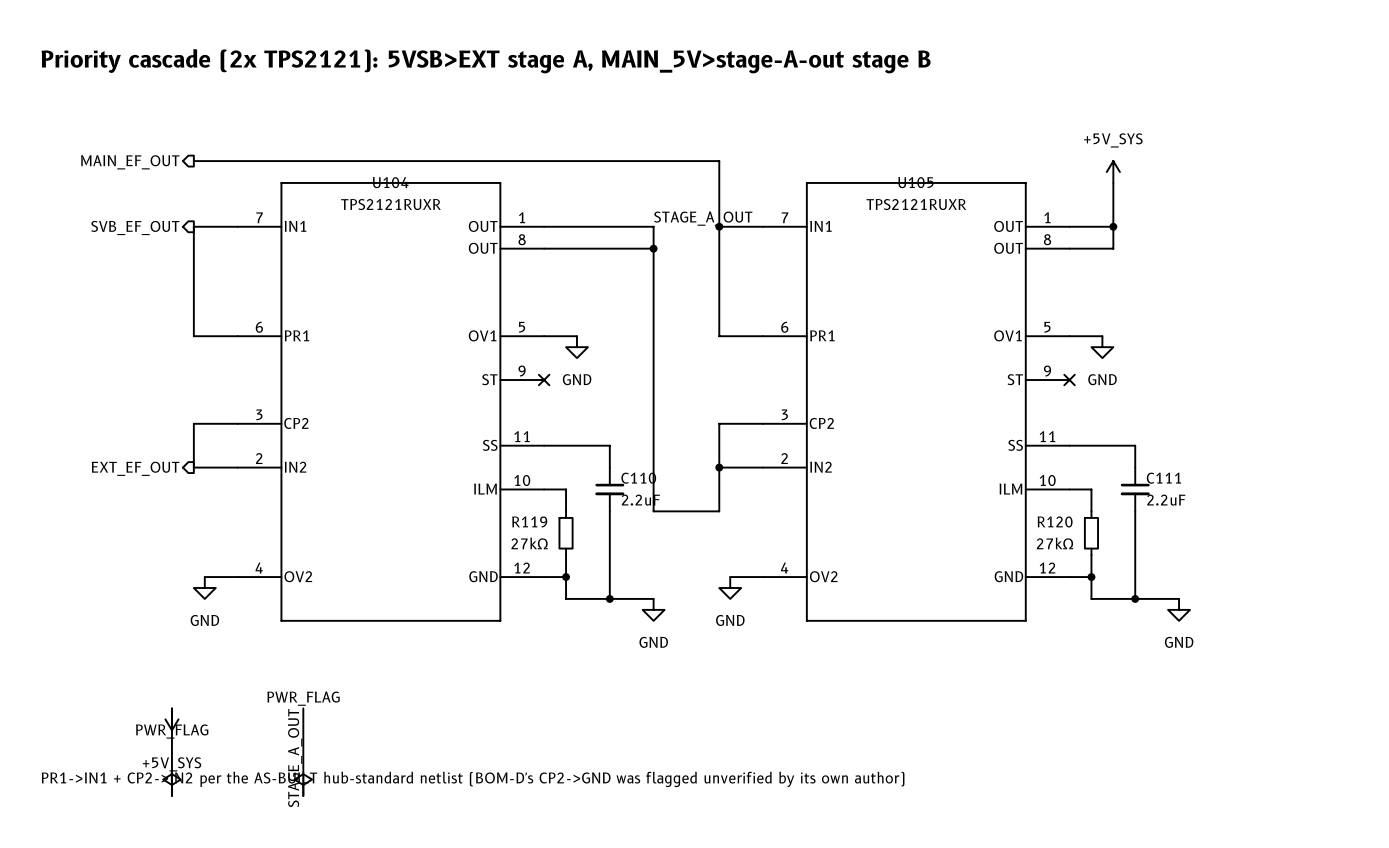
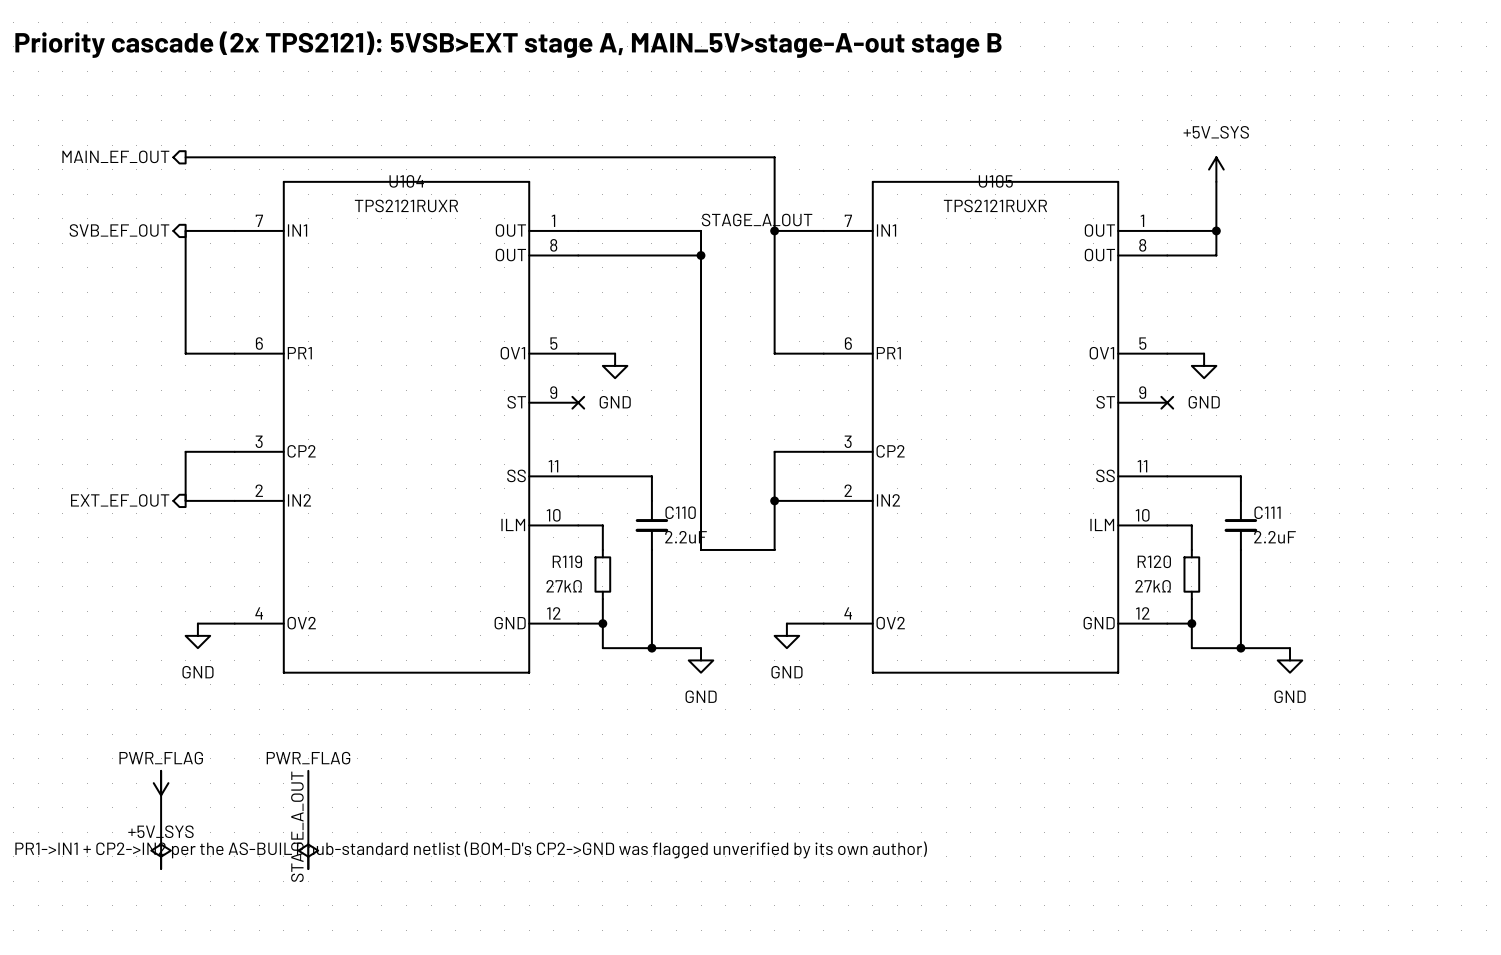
power symbol text position: PWR_FLAG (172, 731) -> PWR_FLAG (161, 758)

